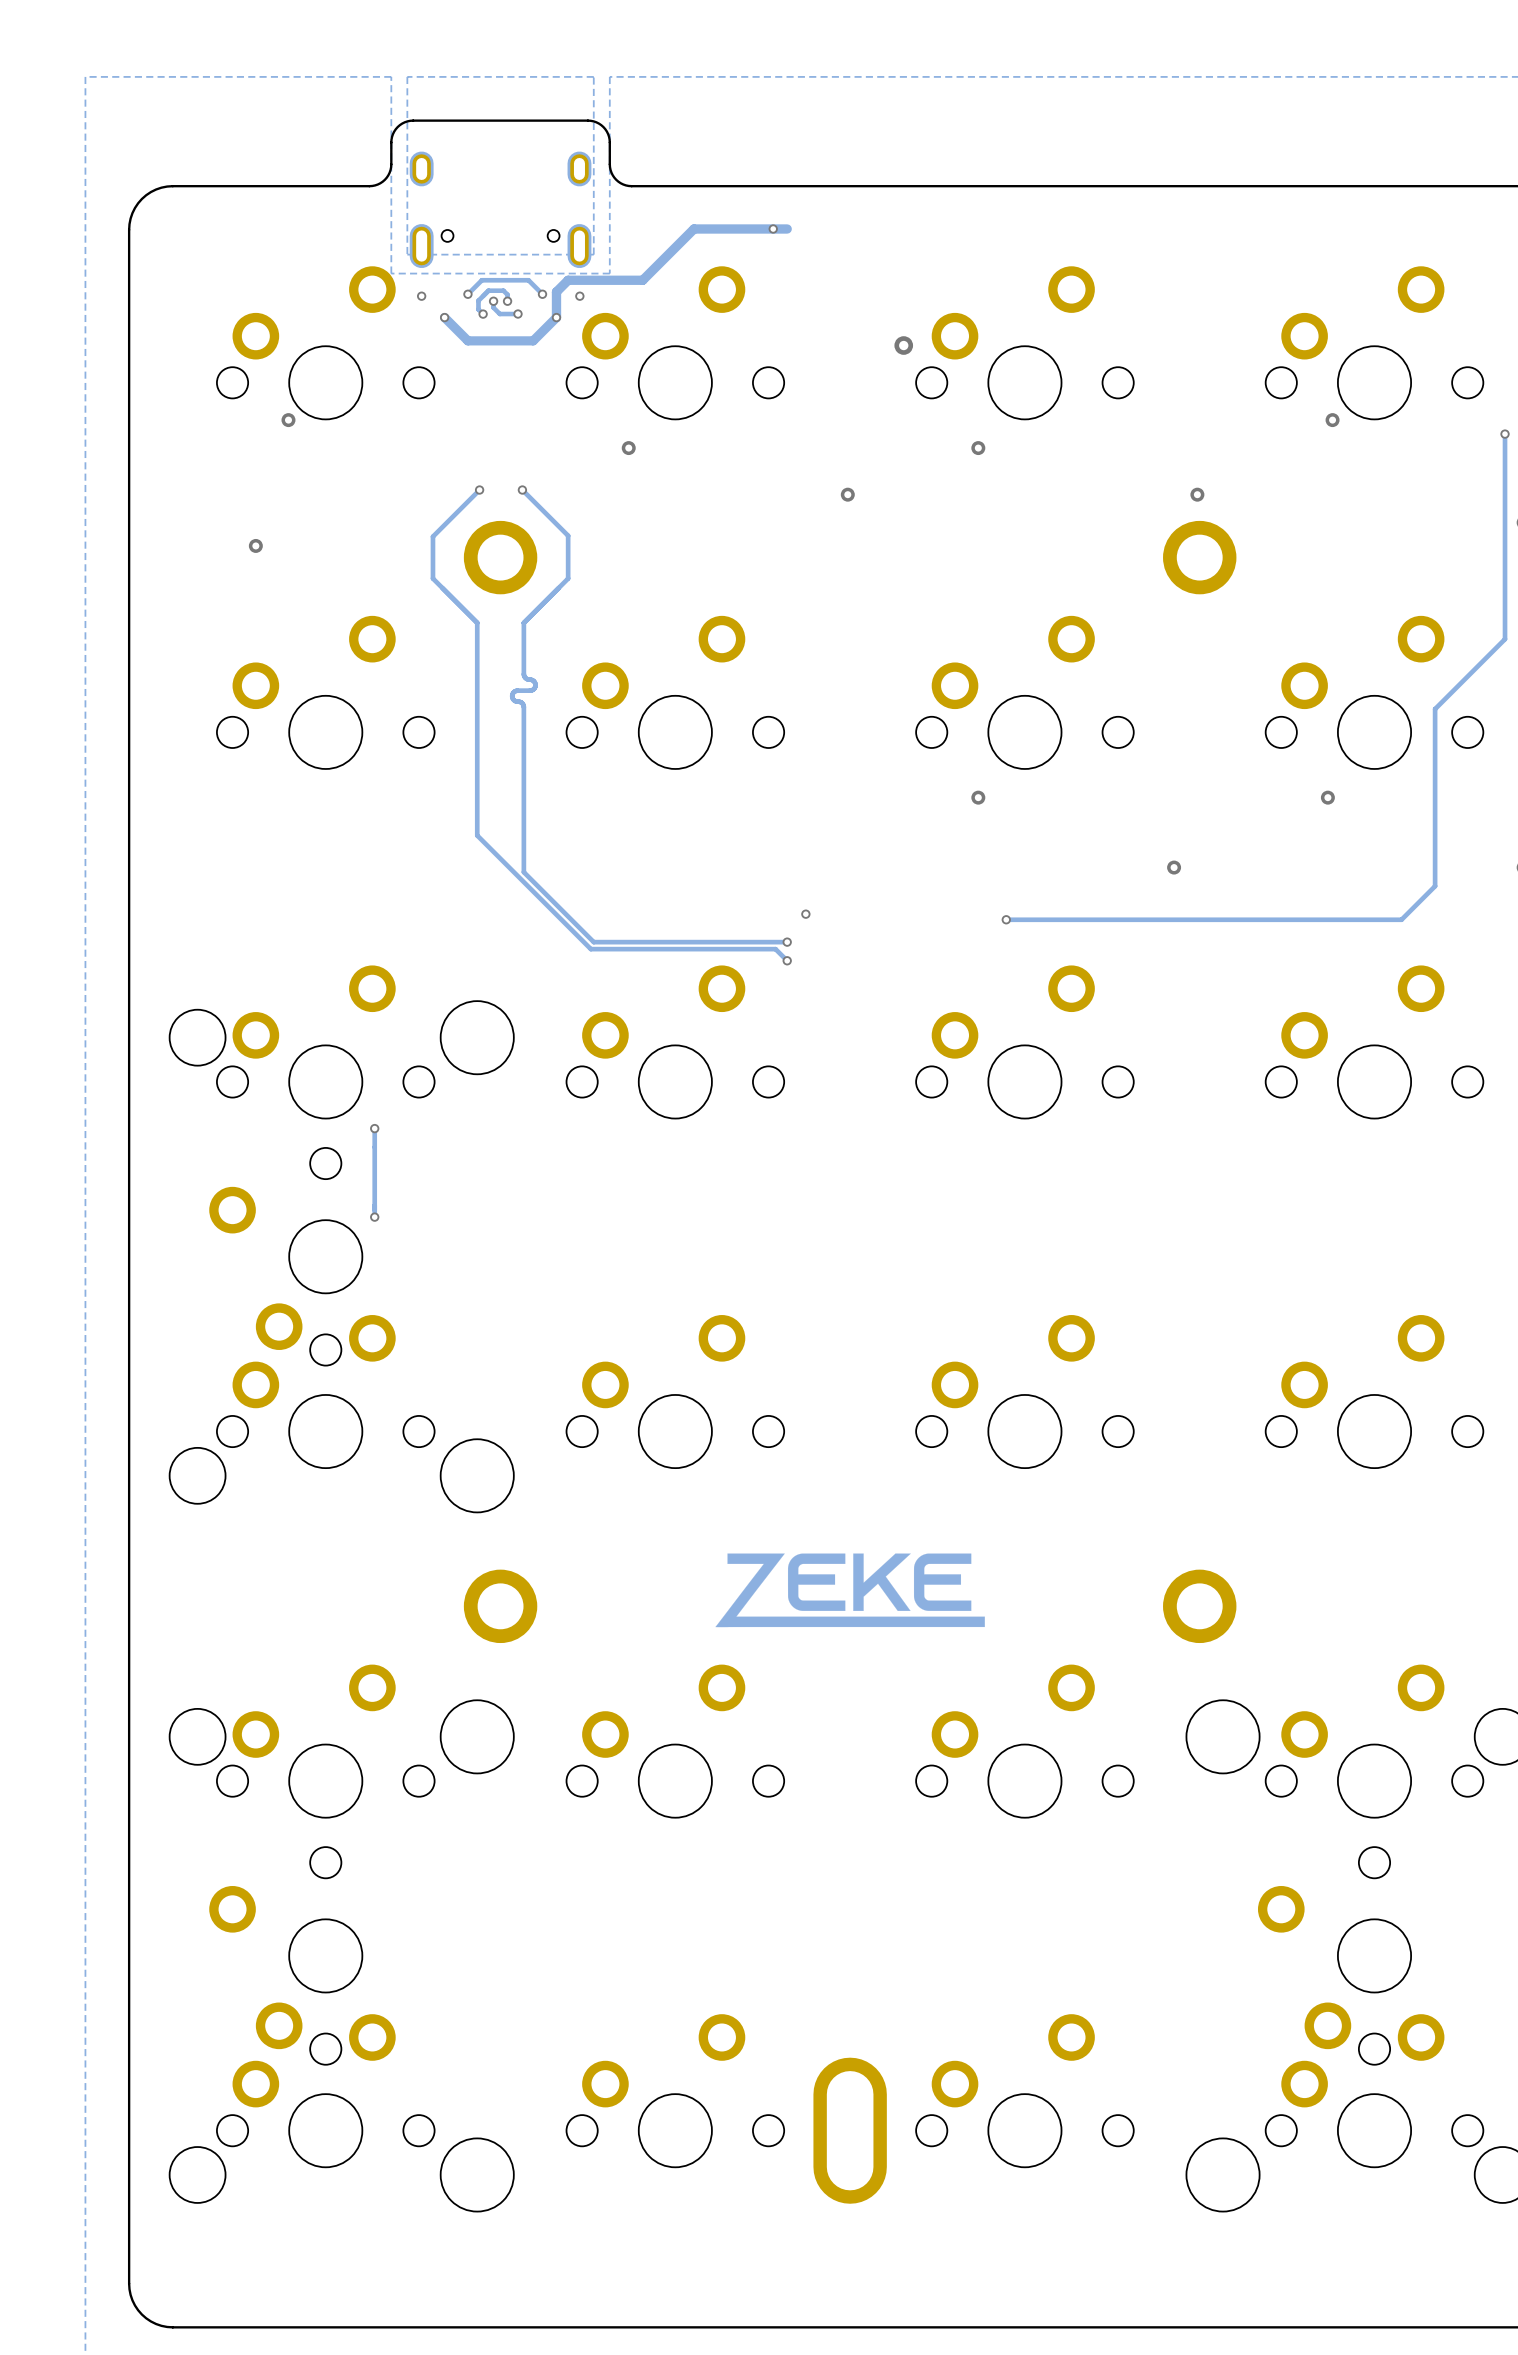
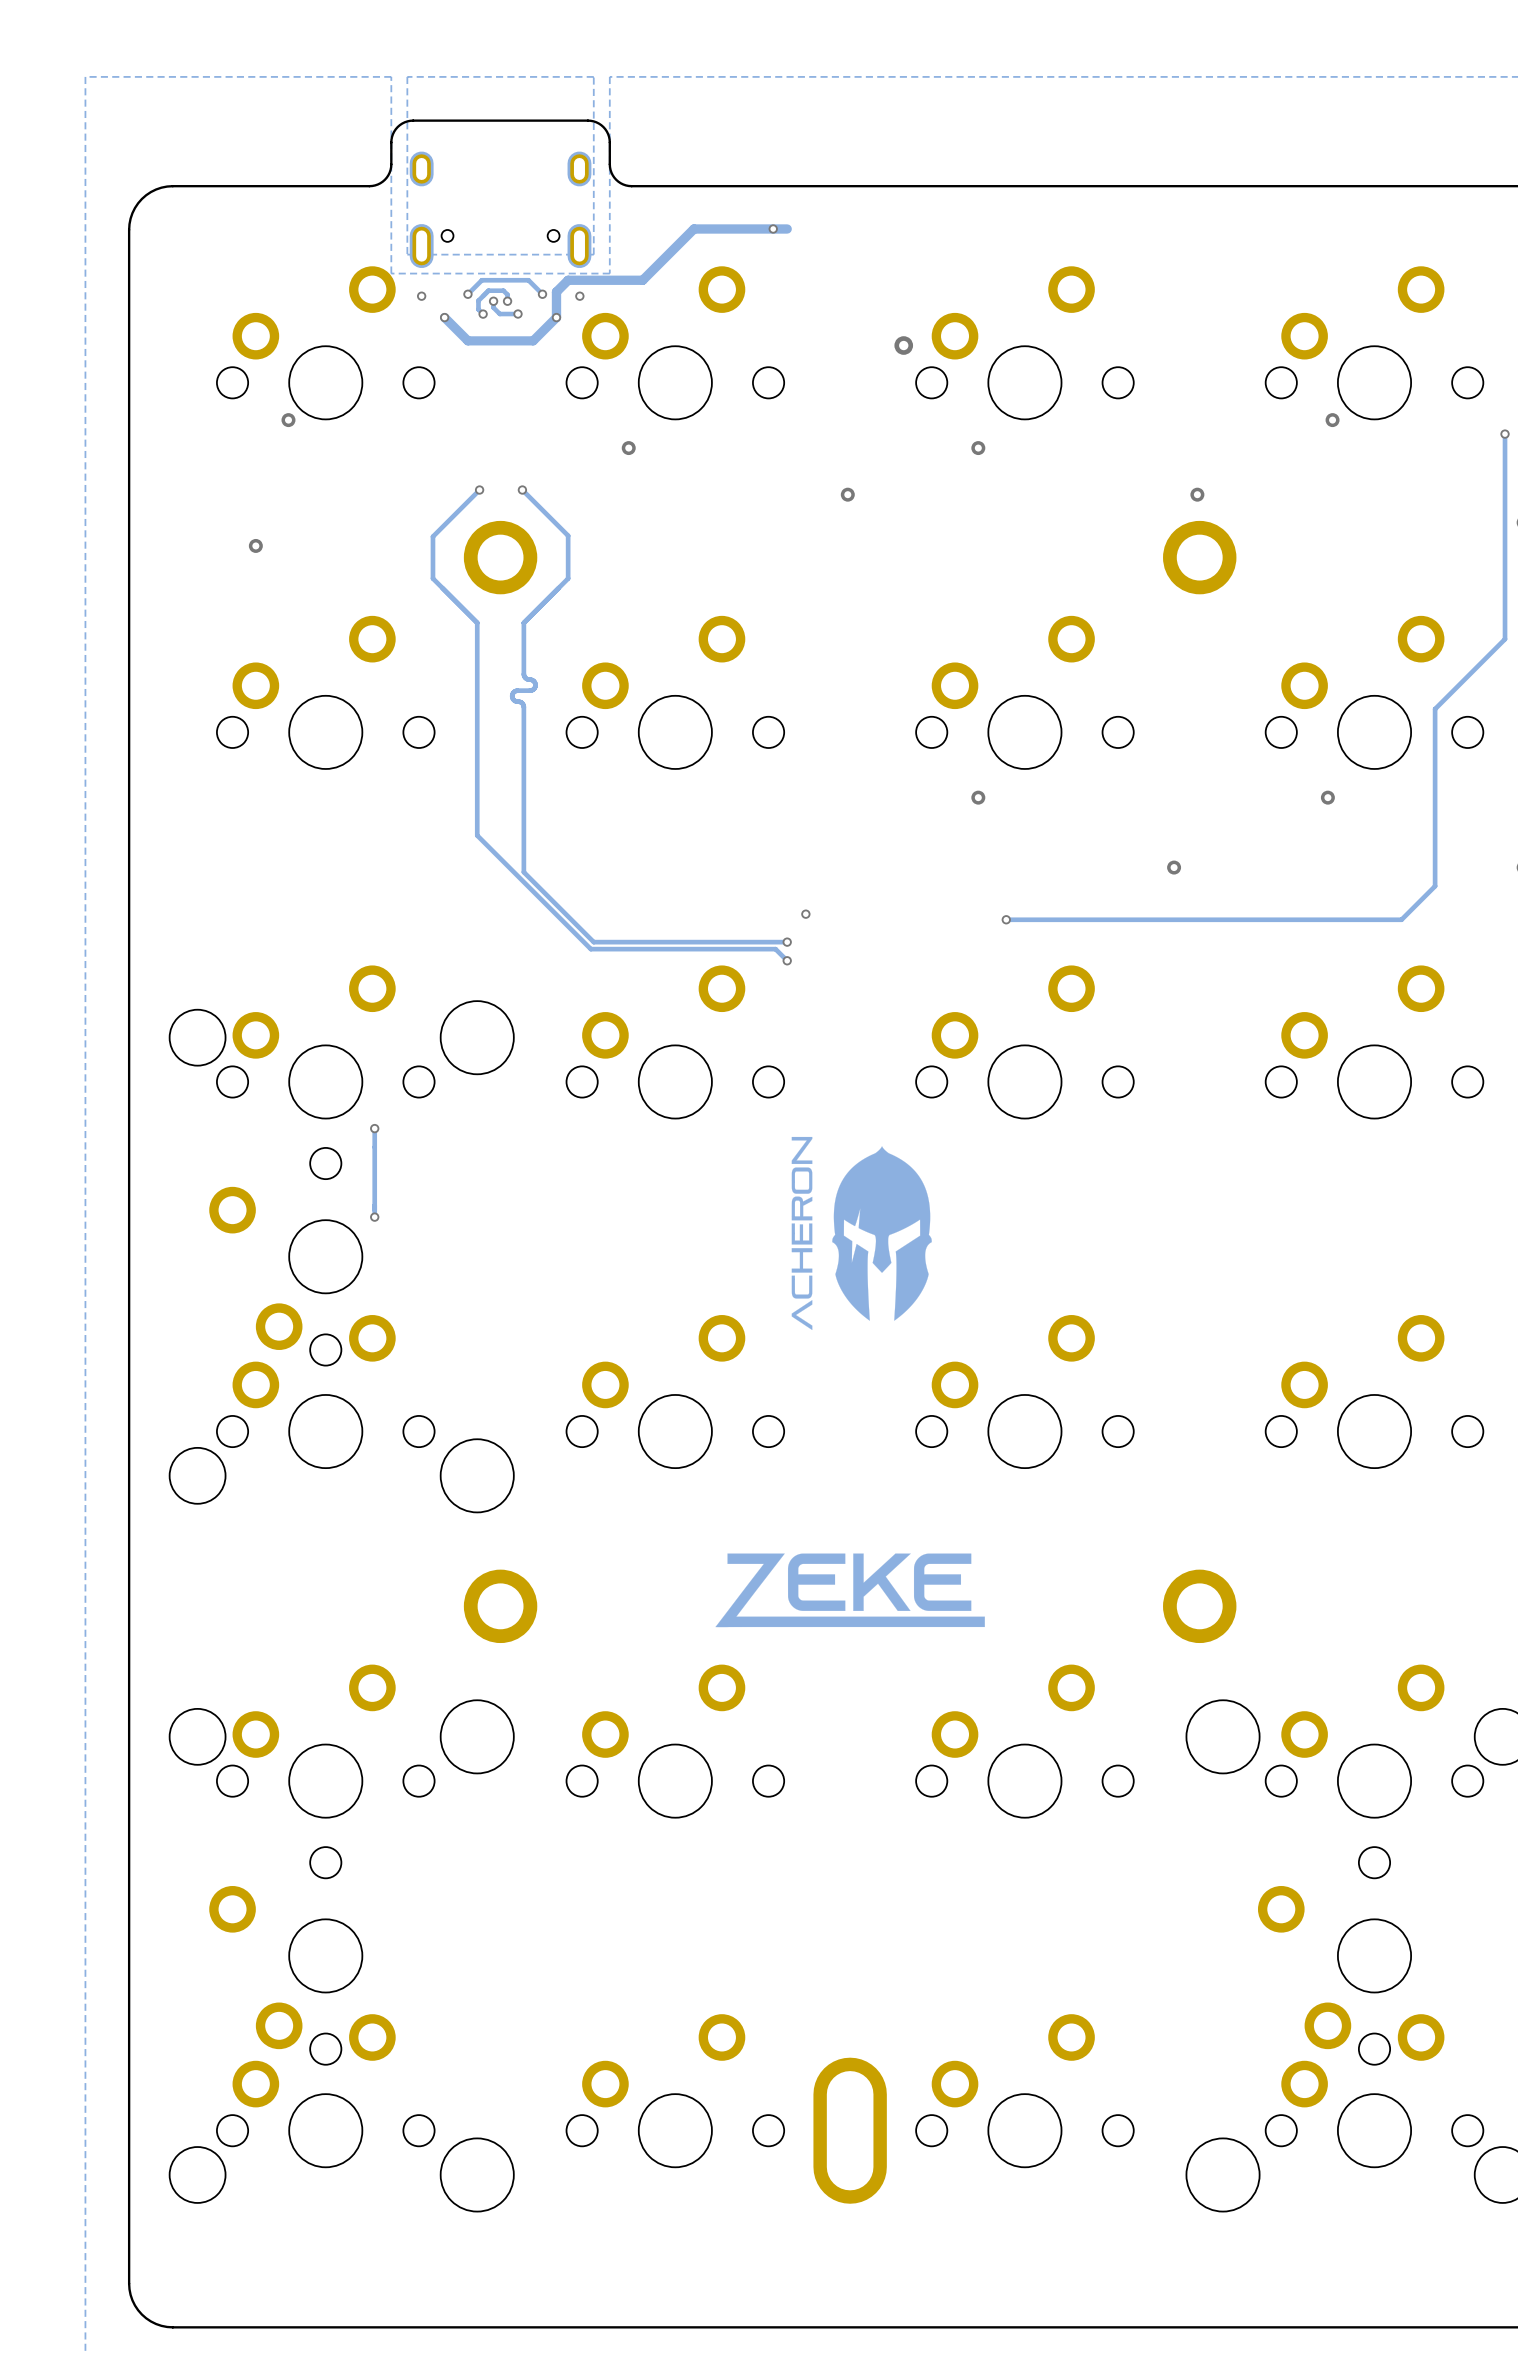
part: none -> (861, 1233)

